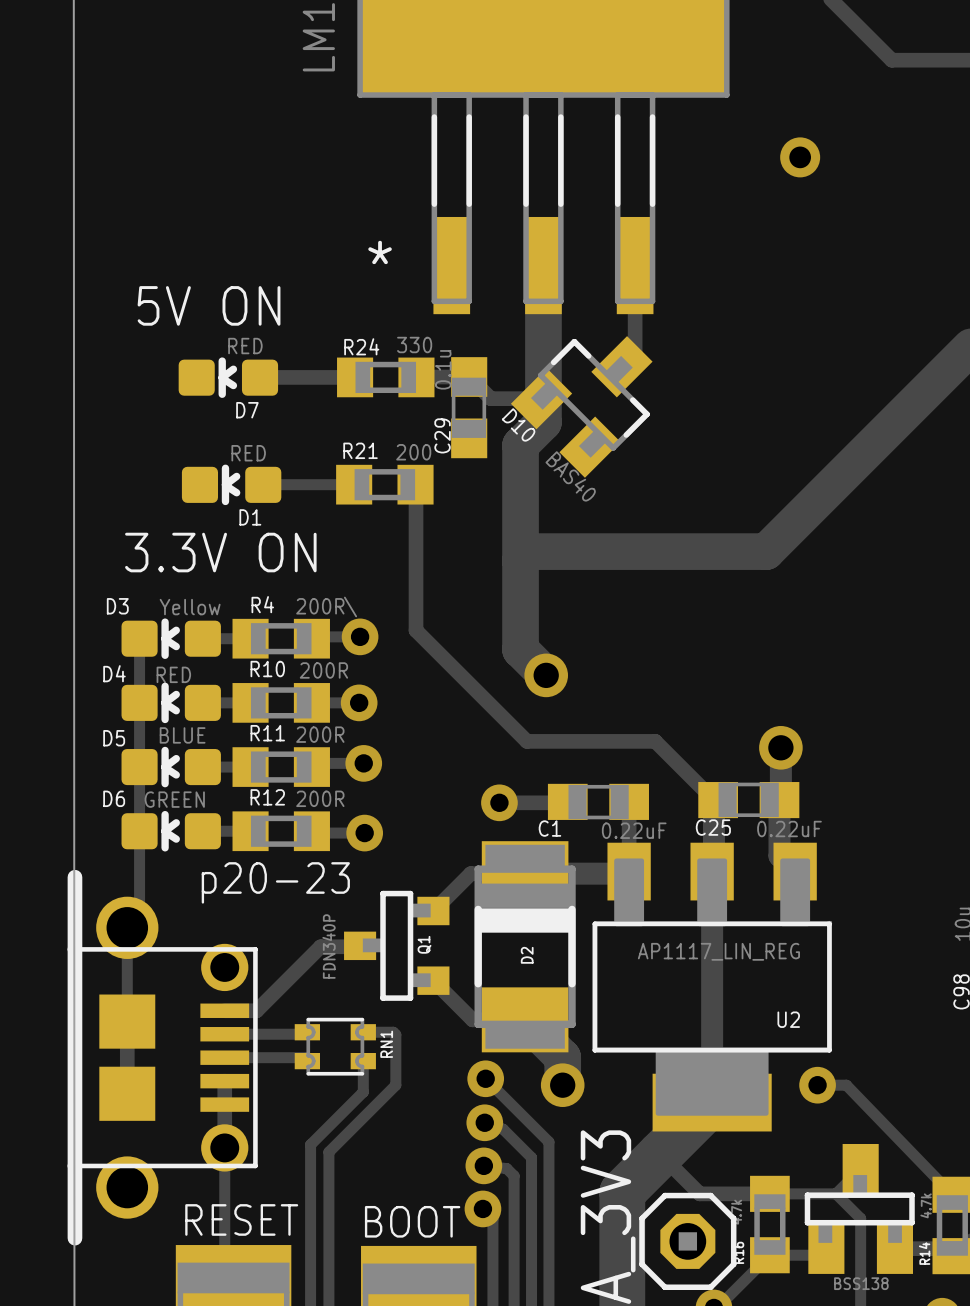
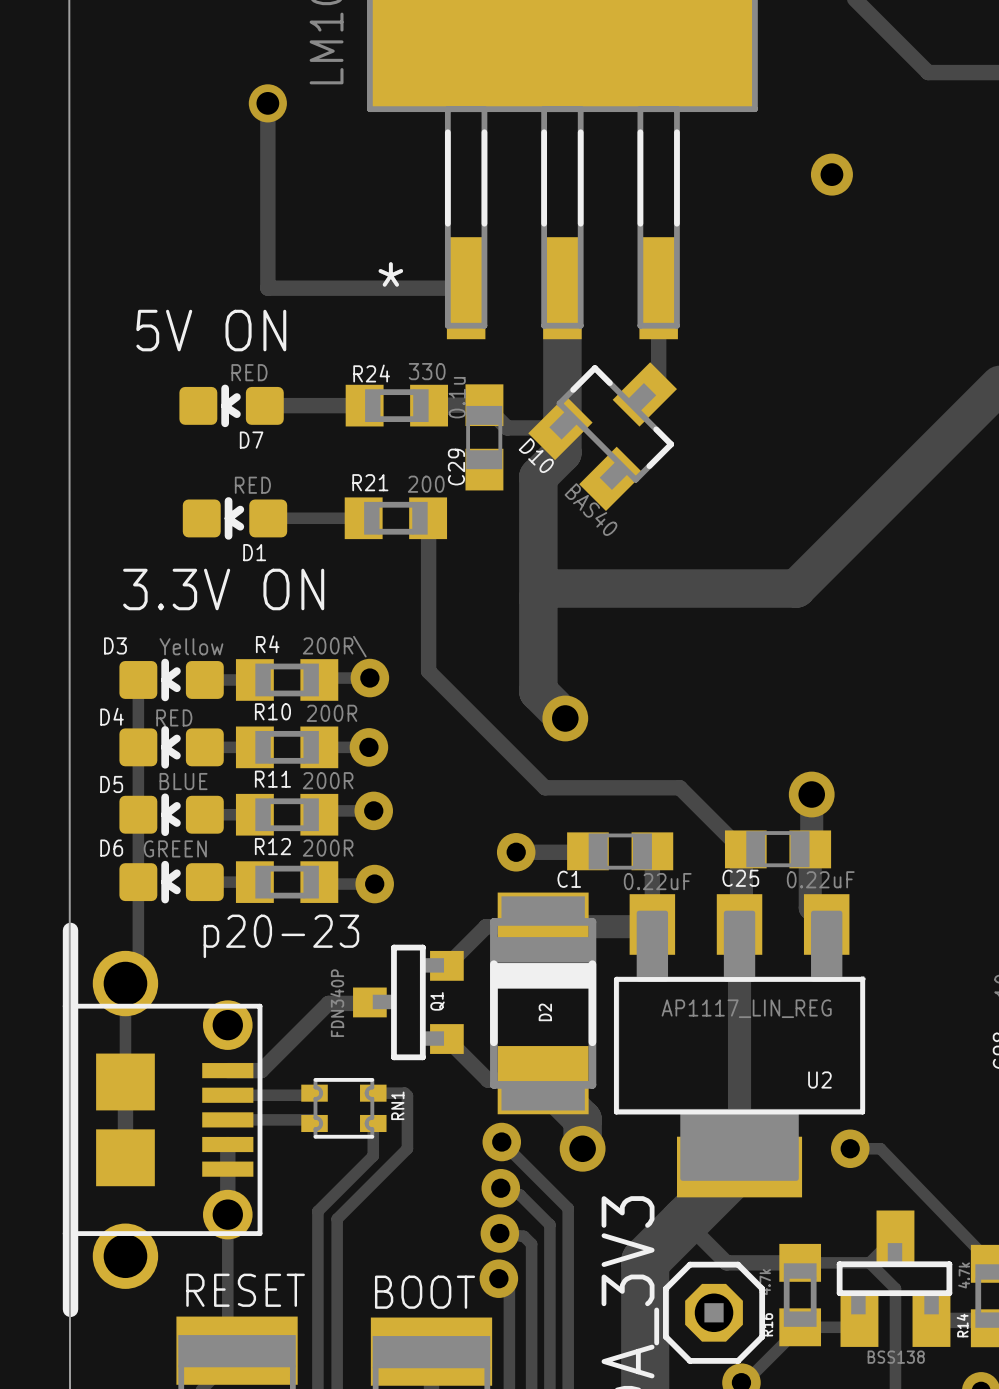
track: none -> (267, 103) (267, 288) (466, 288)
via: none -> (267, 103)

